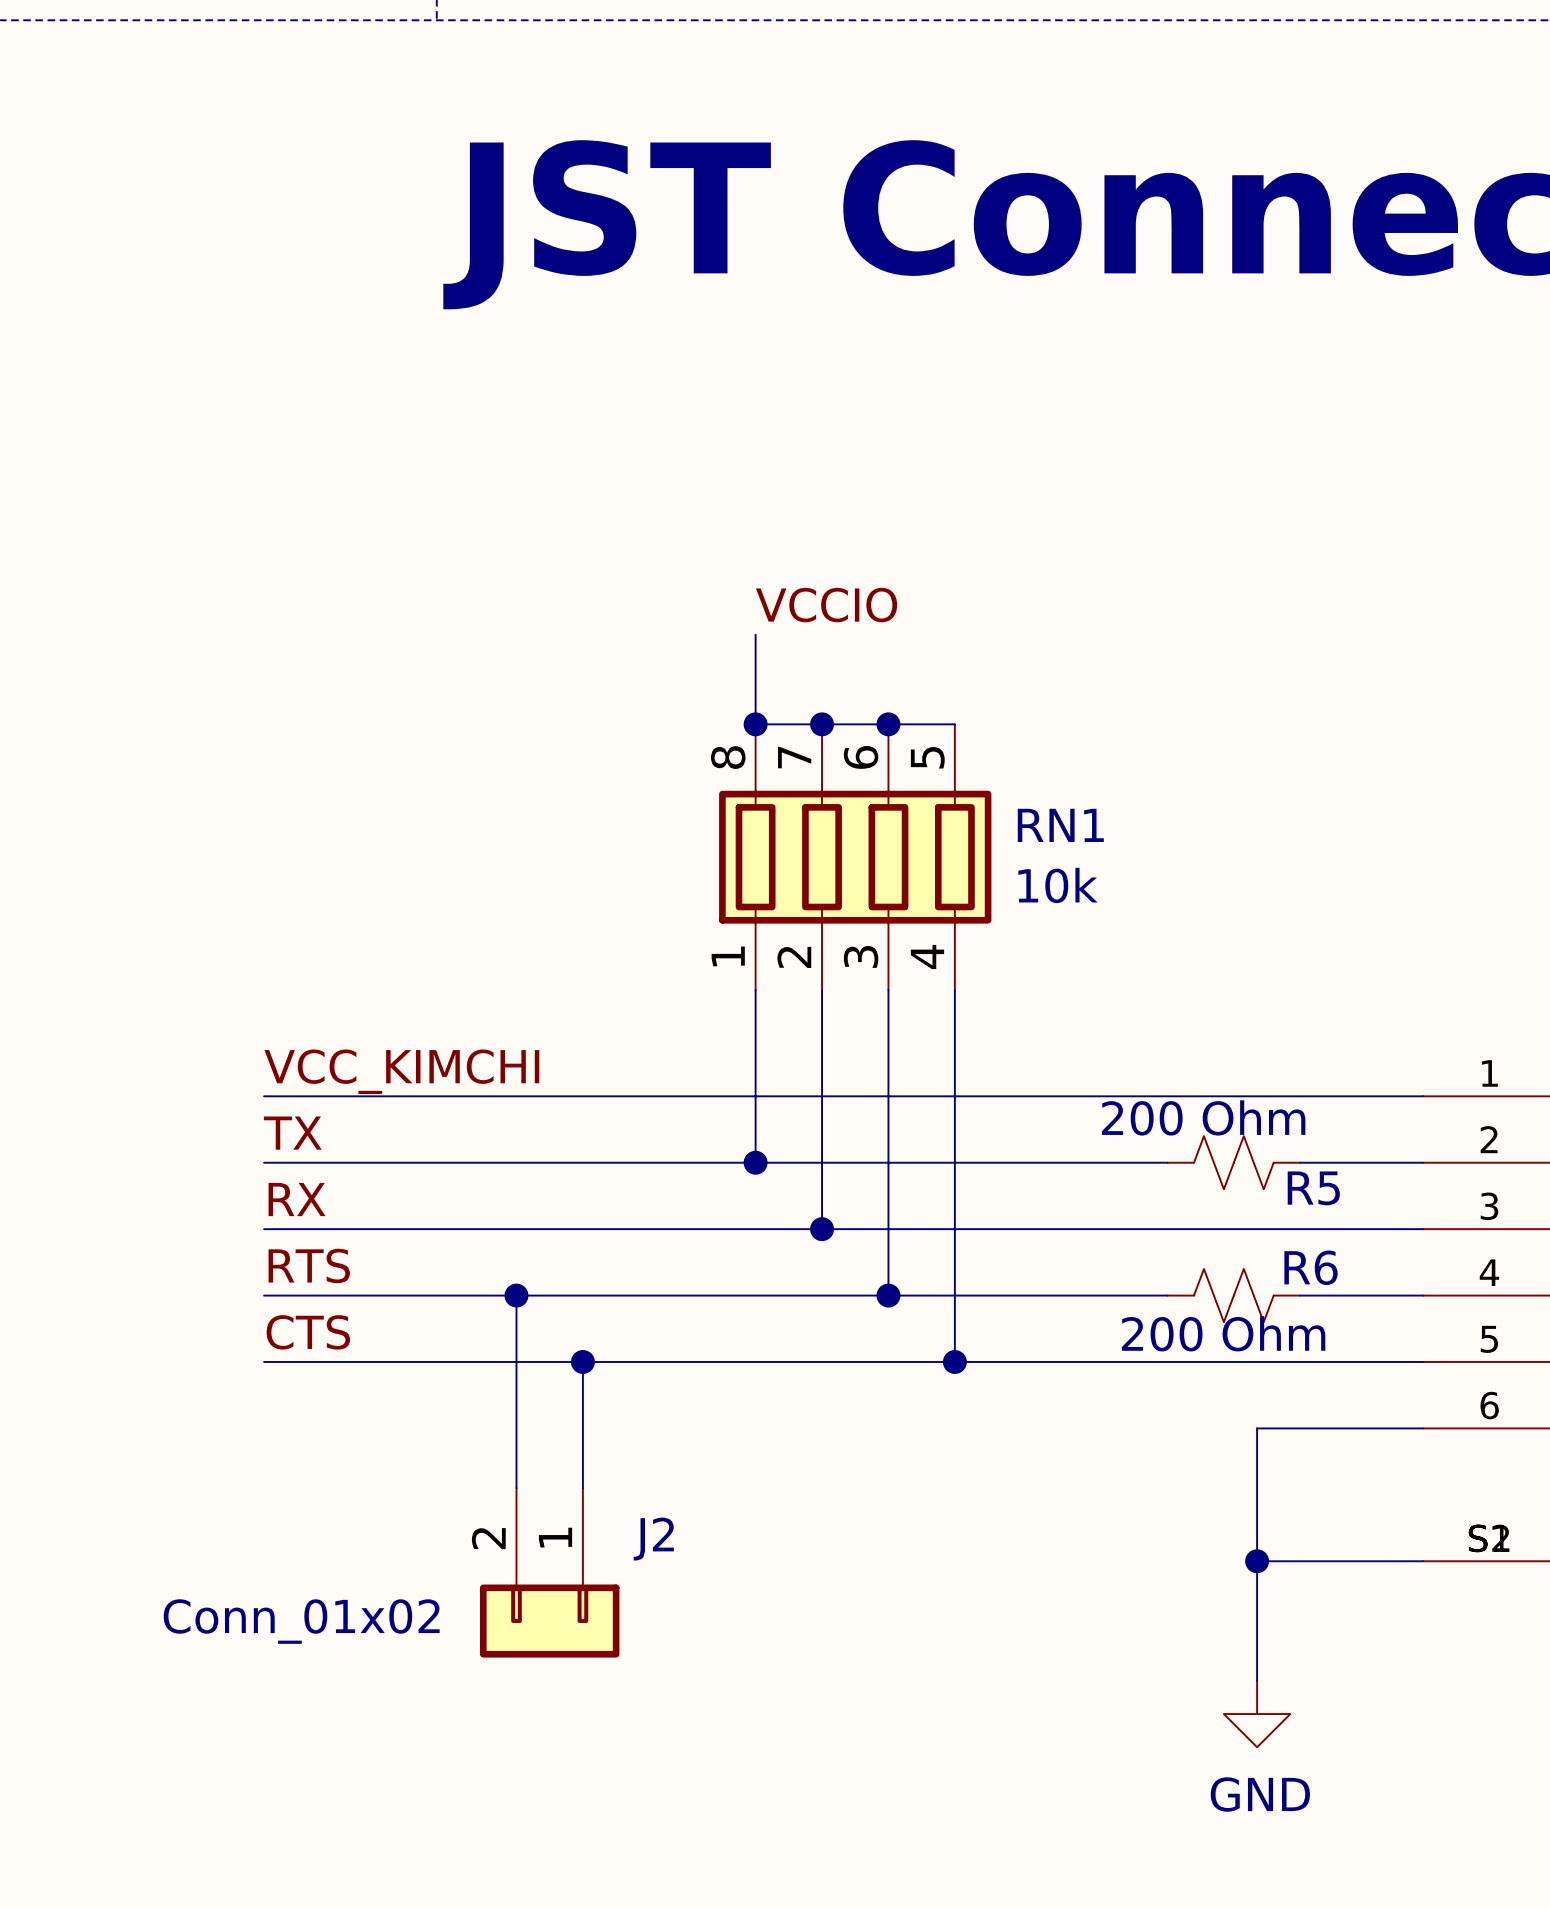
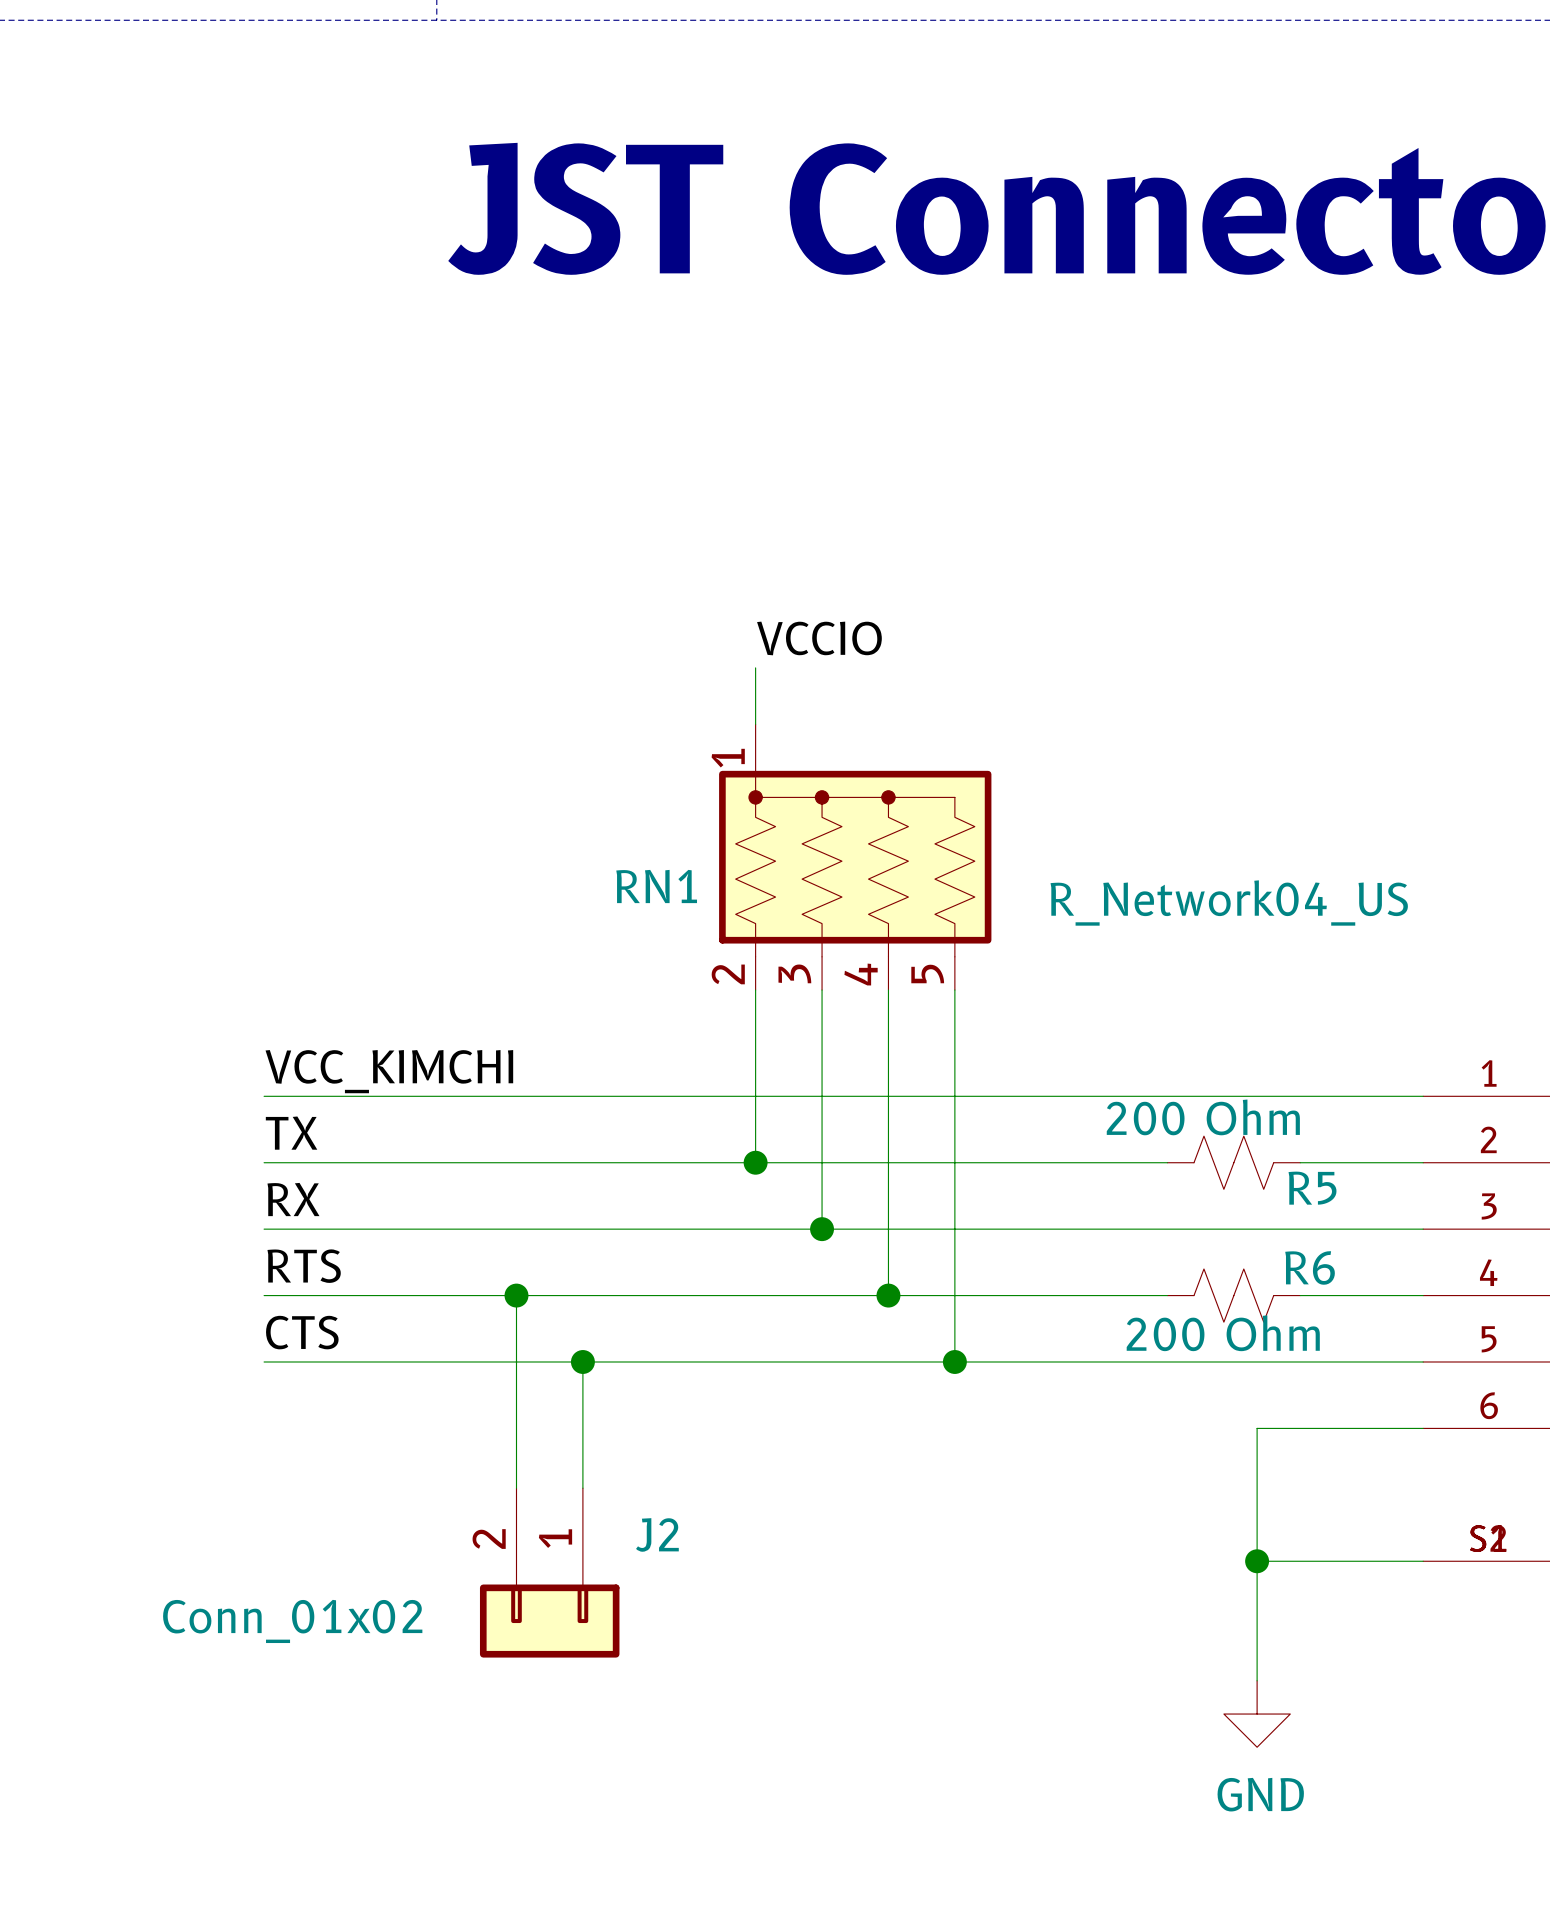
label position: VCCIO (826, 605) -> VCCIO (819, 638)
wire: (755, 634) (755, 667) -> none
RN1 symbol: [719, 724, 992, 991] -> [719, 724, 992, 991]
wire: (755, 724) (954, 724) -> none
junction: (755, 724) -> none
junction: (822, 724) -> none
junction: (888, 724) -> none
RN1 name position: RN1 (1060, 825) -> RN1 (656, 886)
RN1 value: 10k (1057, 885) -> R_Network04_US (1229, 903)

